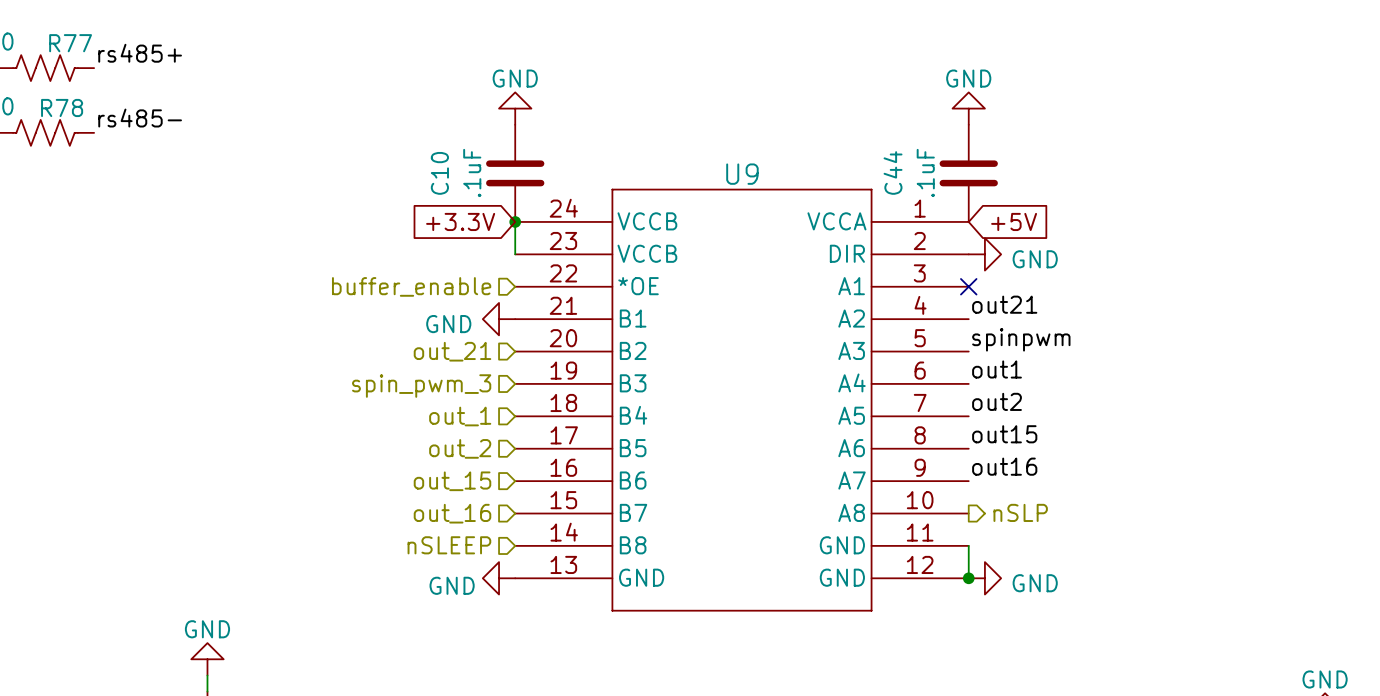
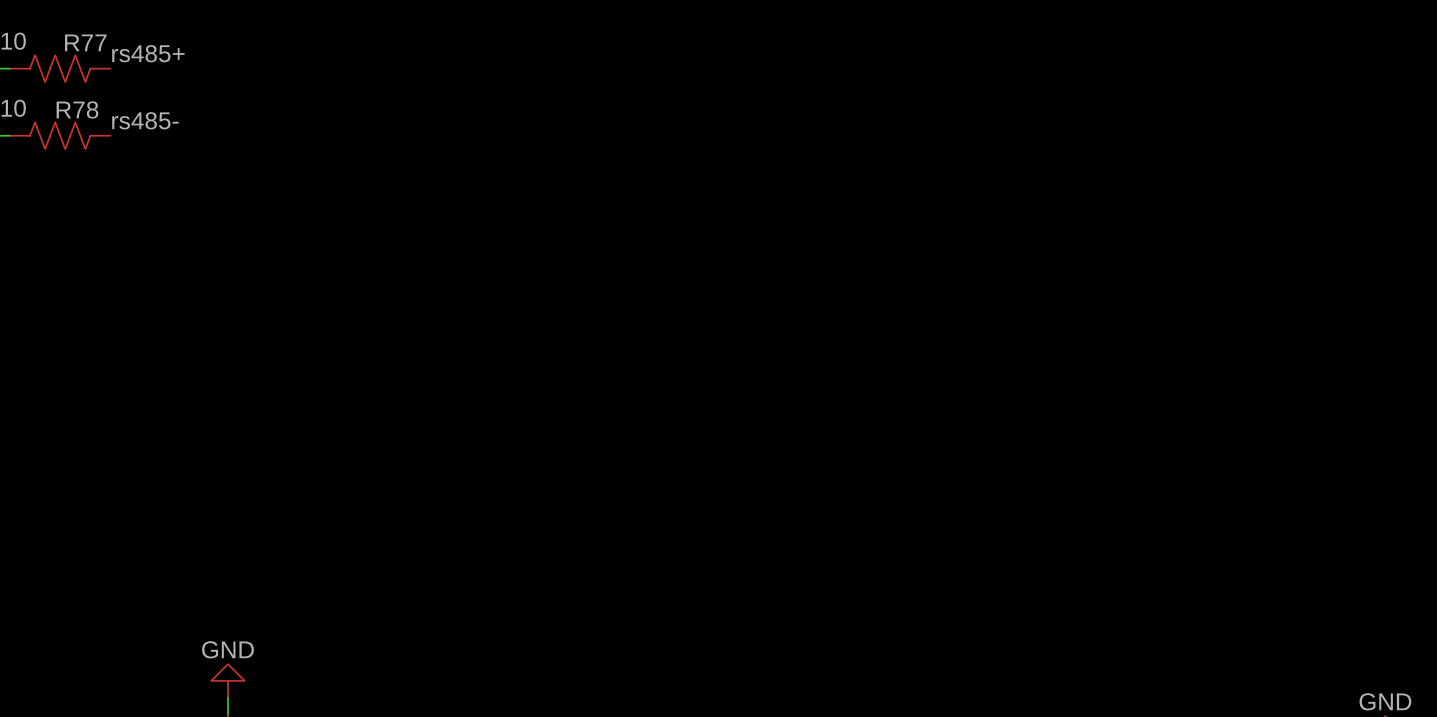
power symbol: GND (515, 108) -> none
power symbol: GND (968, 108) -> none
C10: .1uF (515, 173) -> none
C44: .1uF (968, 173) -> none
global label: +3.3V (460, 221) -> none
wire: (515, 221) (515, 254) -> none
junction: (515, 221) -> none
global label: +5V (1014, 221) -> none
power symbol: GND (984, 254) -> none
hierarchical label: buffer_enable (411, 286) -> none
no-connect mark: (968, 286) -> none
label: out21 (1004, 304) -> none
power symbol: GND (499, 319) -> none
label: spinpwm (1021, 339) -> none
hierarchical label: out_21 (452, 351) -> none
label: out1 (997, 369) -> none
hierarchical label: spin_pwm_3 (421, 386) -> none
U9: (741, 400) -> none
label: out2 (997, 401) -> none
hierarchical label: out_1 (460, 416) -> none
label: out15 (1004, 434) -> none
hierarchical label: out_2 (460, 448) -> none
label: out16 (1004, 466) -> none
hierarchical label: out_15 (452, 481) -> none
hierarchical label: nSLP (1020, 512) -> none
hierarchical label: out_16 (452, 513) -> none
hierarchical label: nSLEEP (449, 545) -> none
wire: (968, 545) (968, 578) -> none
power symbol: GND (499, 578) -> none
junction: (968, 578) -> none
power symbol: GND (984, 578) -> none

